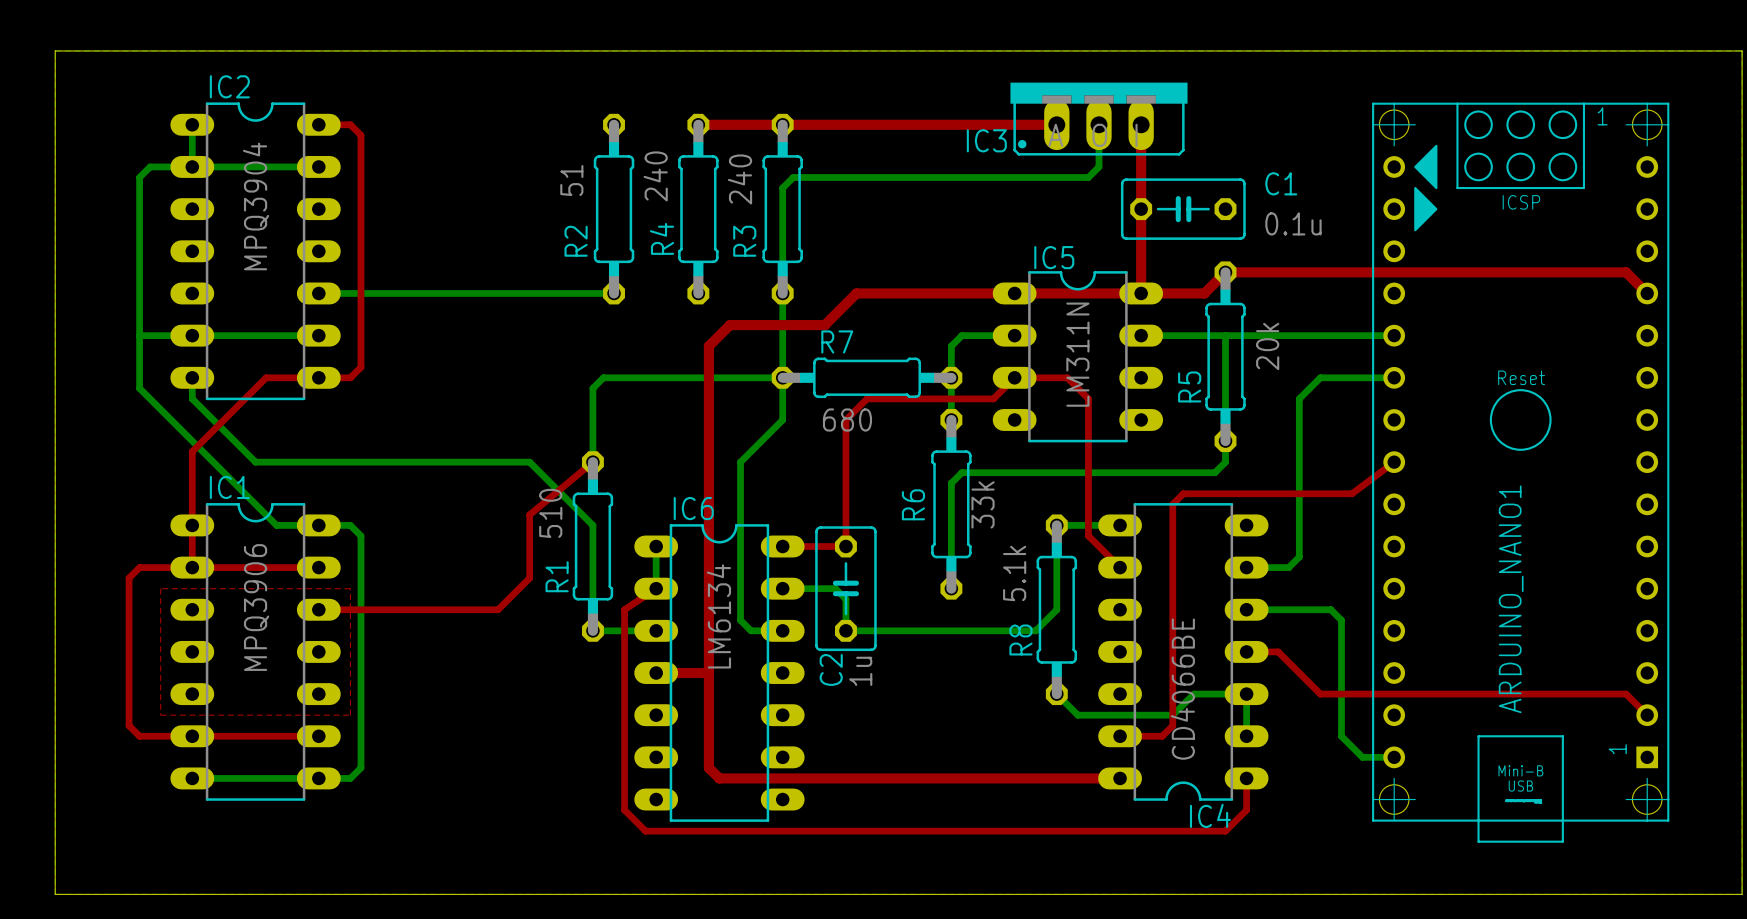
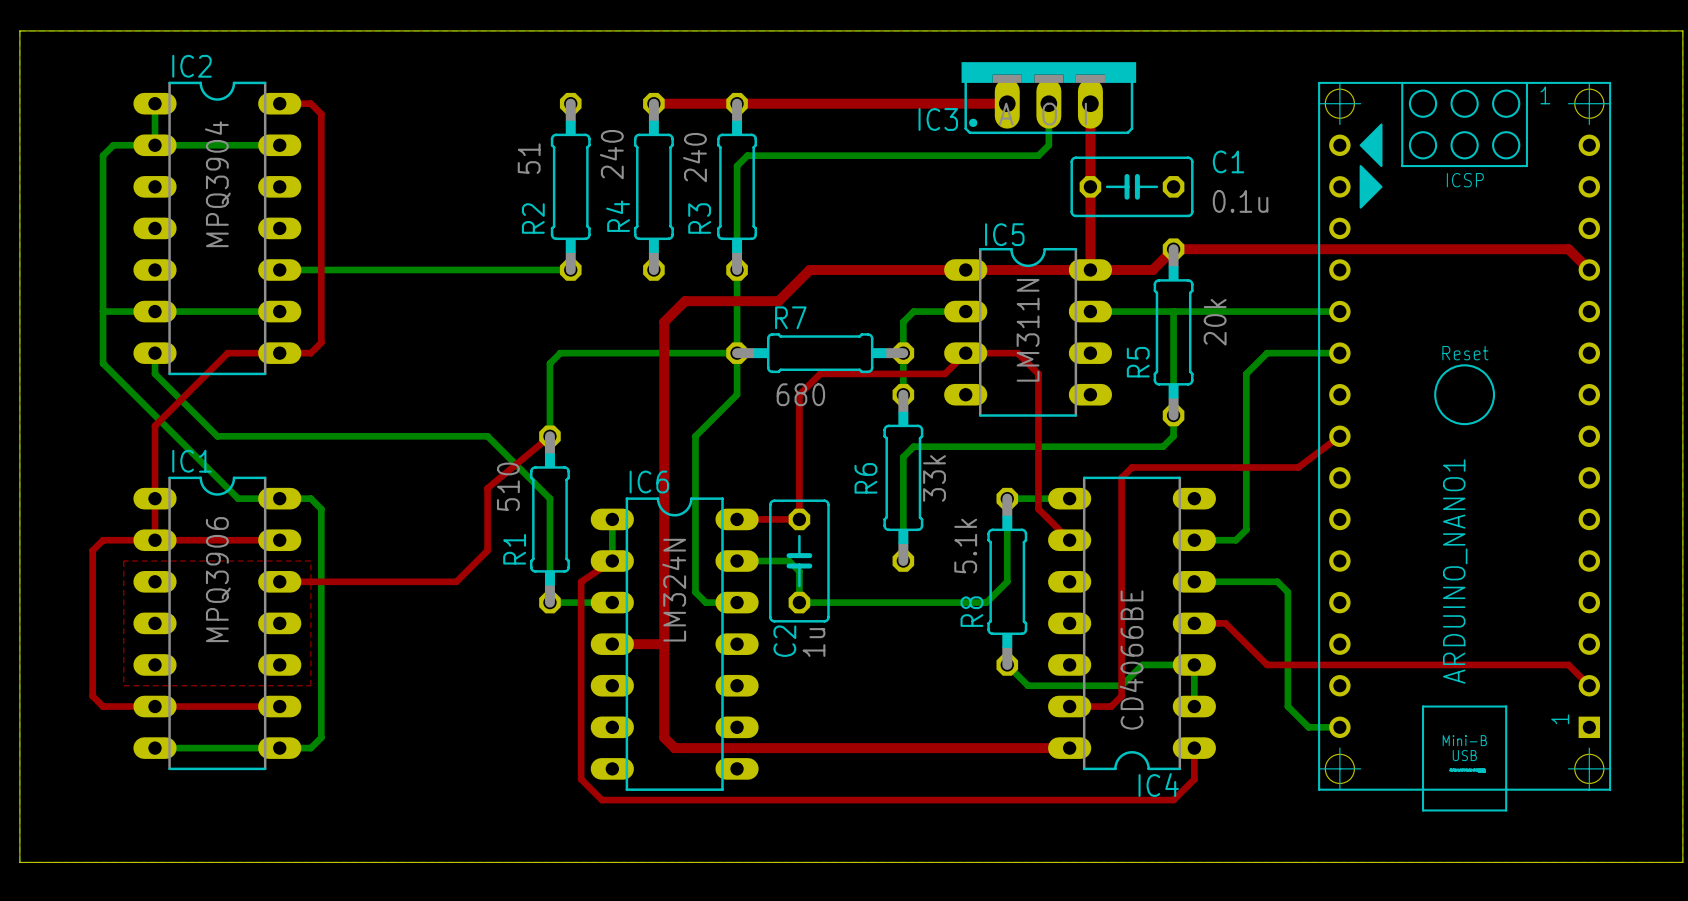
IC6 value: LM6134 (718, 616) -> LM324N (674, 590)

